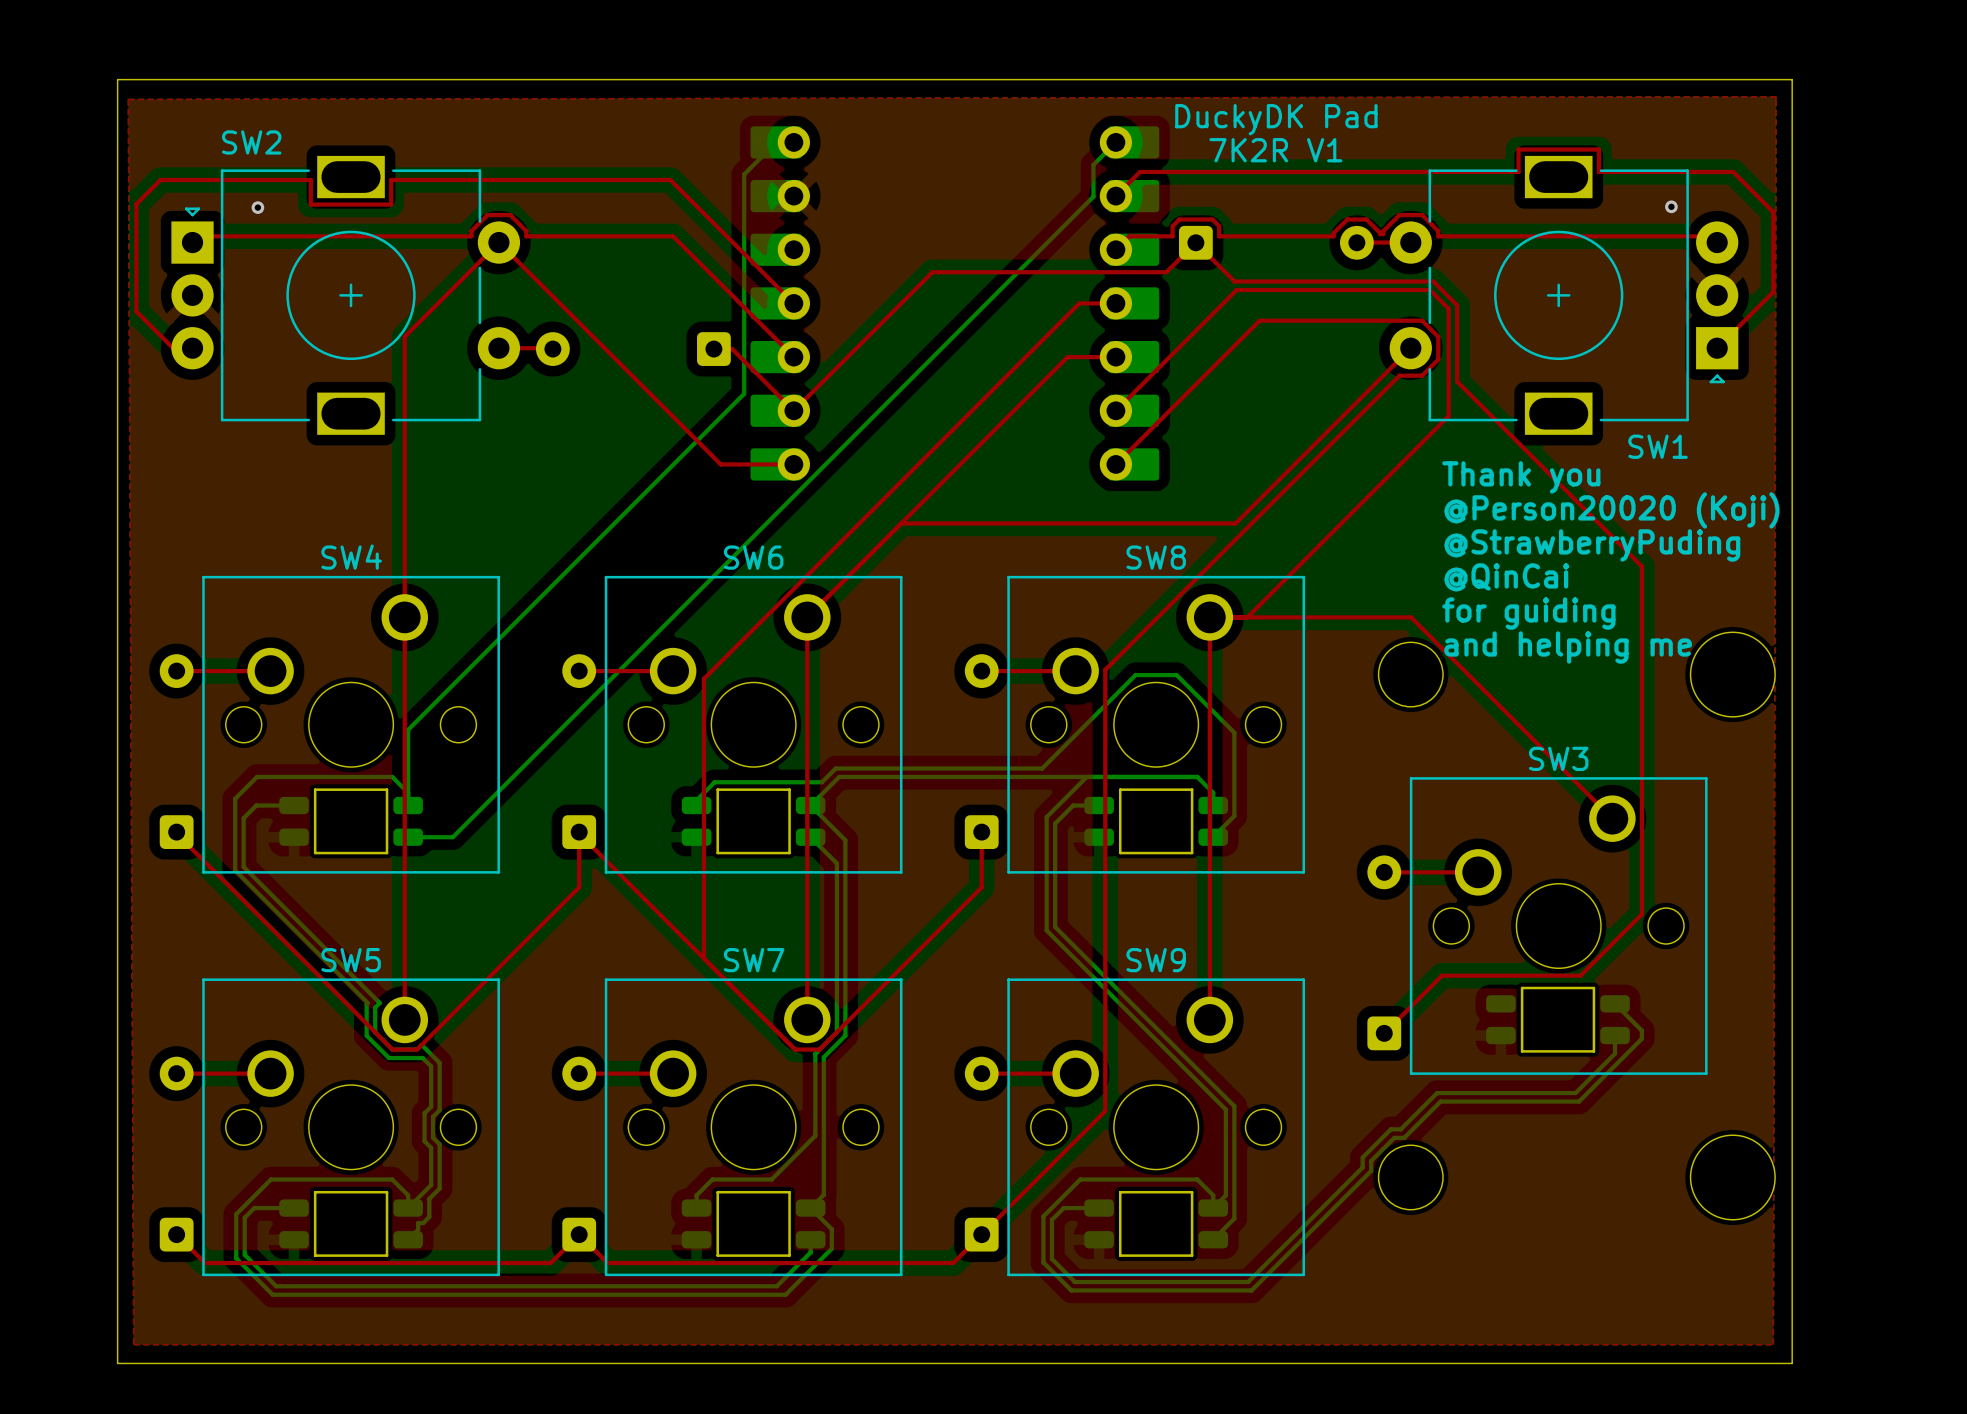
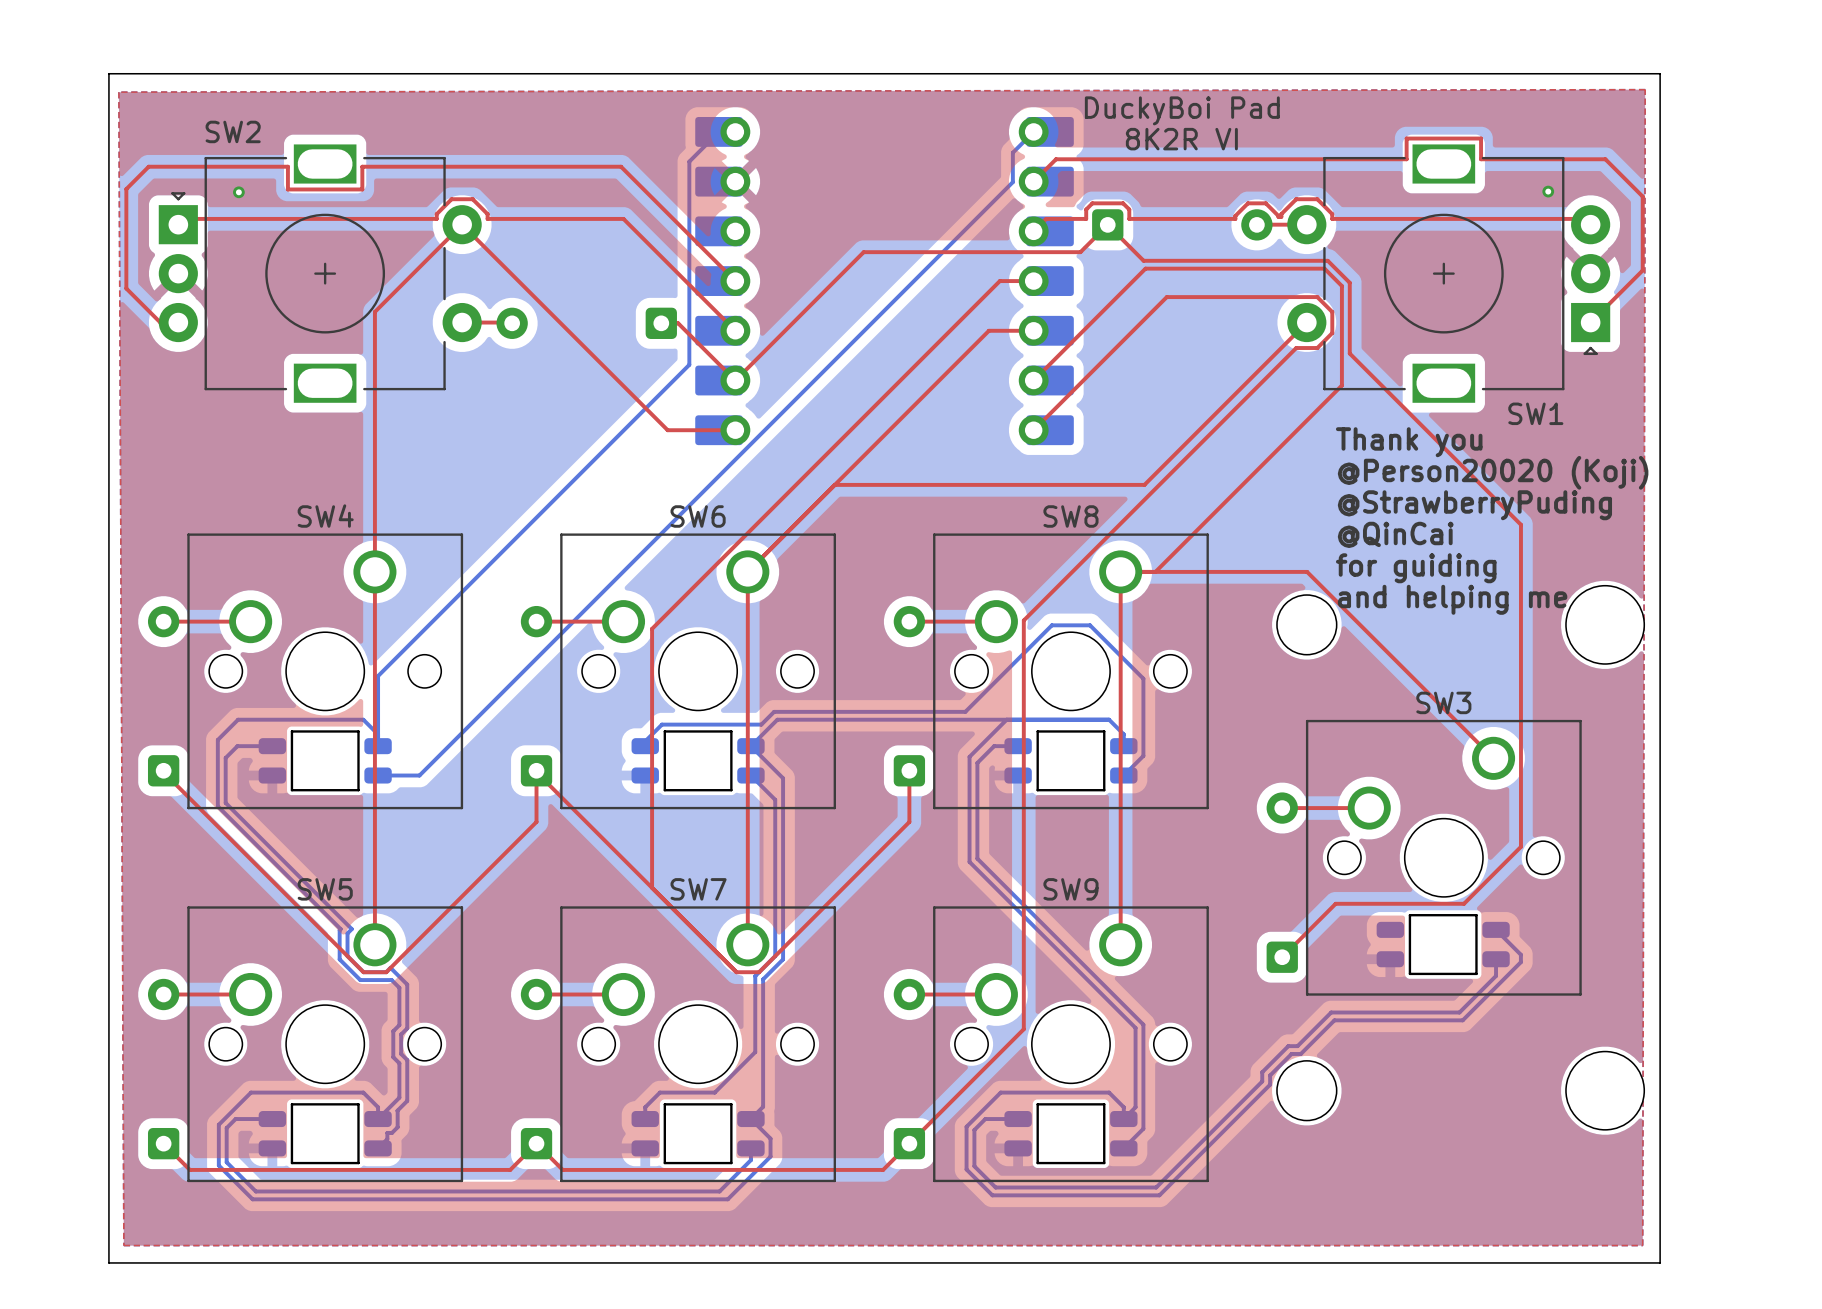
text: DuckyDK Pad (1276, 119) -> DuckyBoi Pad (1182, 110)
text: 7K2R V1 (1275, 150) -> 8K2R VI (1181, 139)

